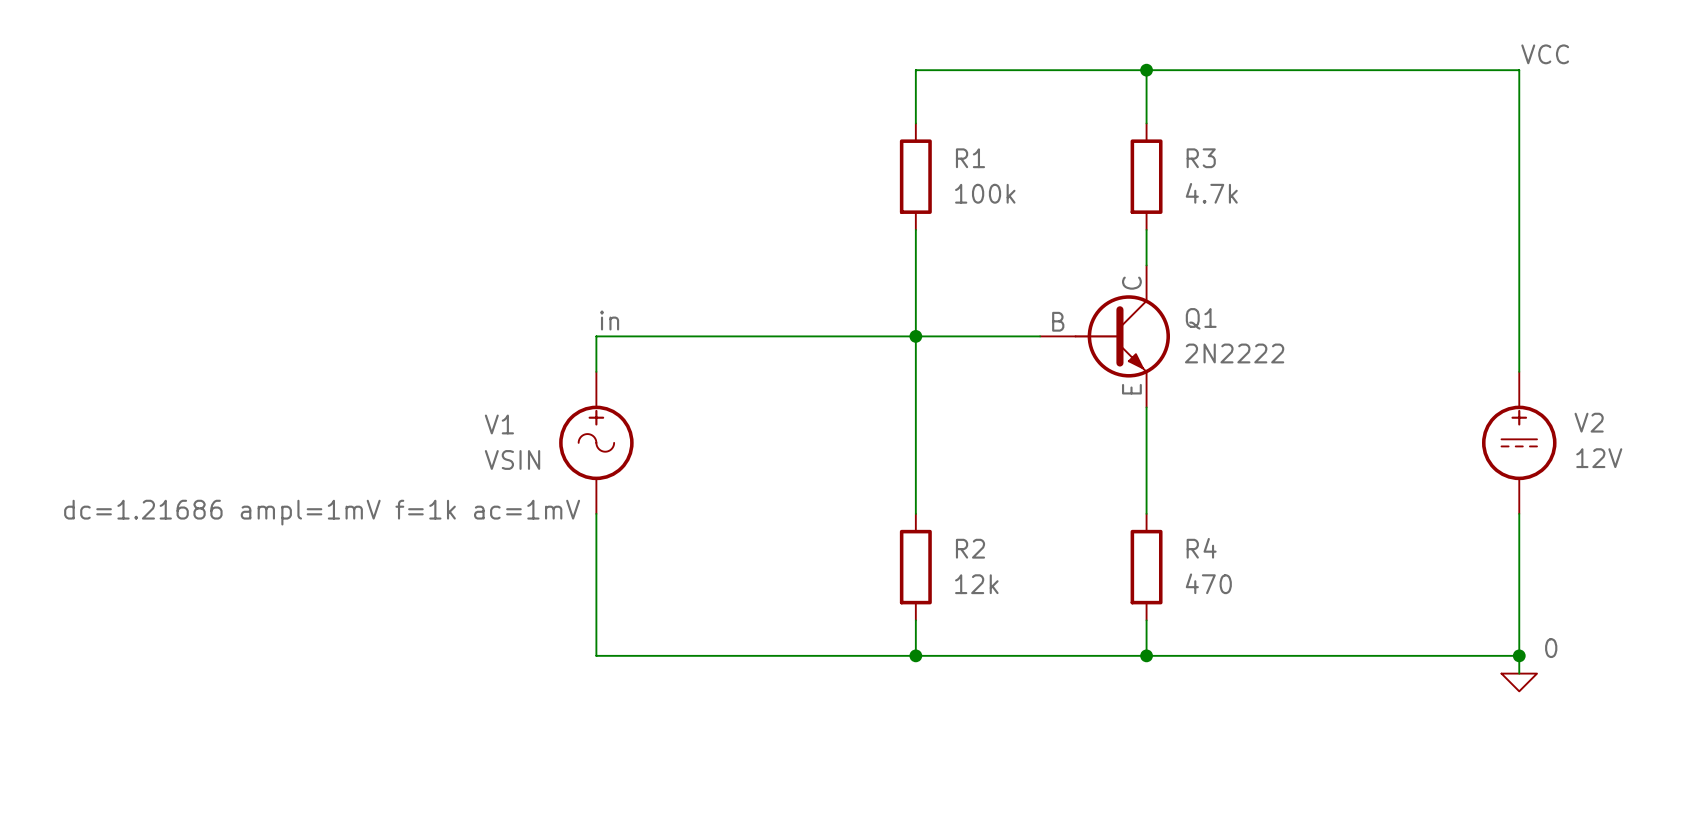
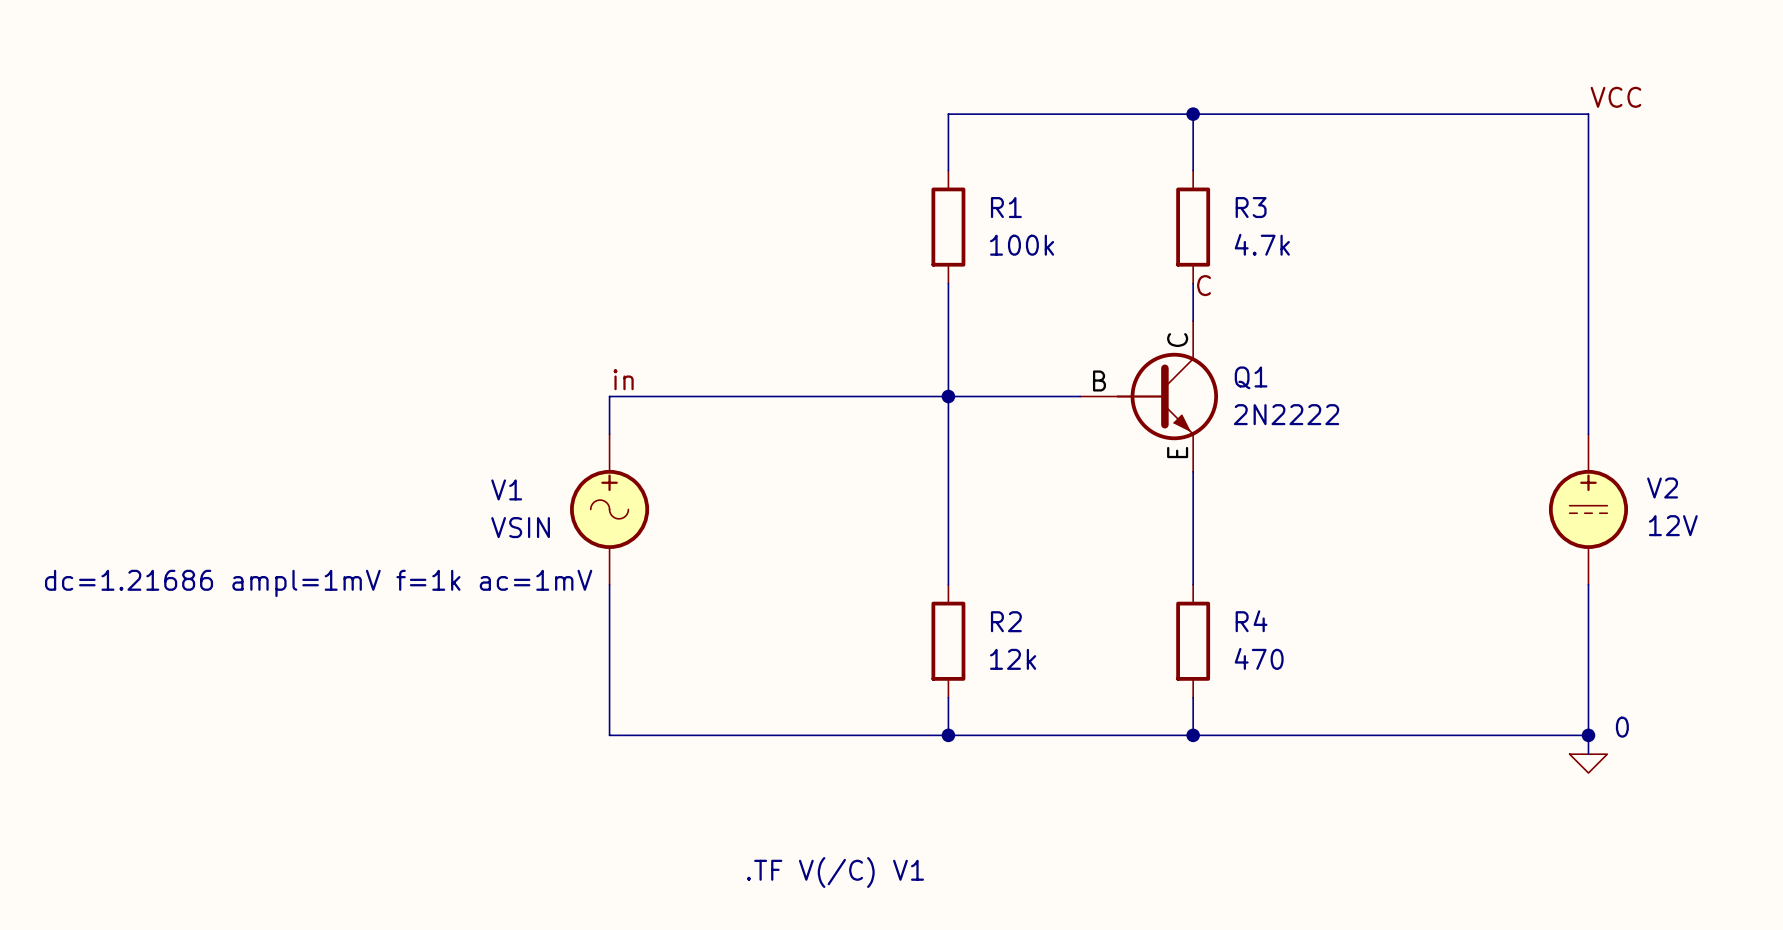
label: none -> C (1204, 285)
text: none -> .TF V(/C) V1 (835, 872)

